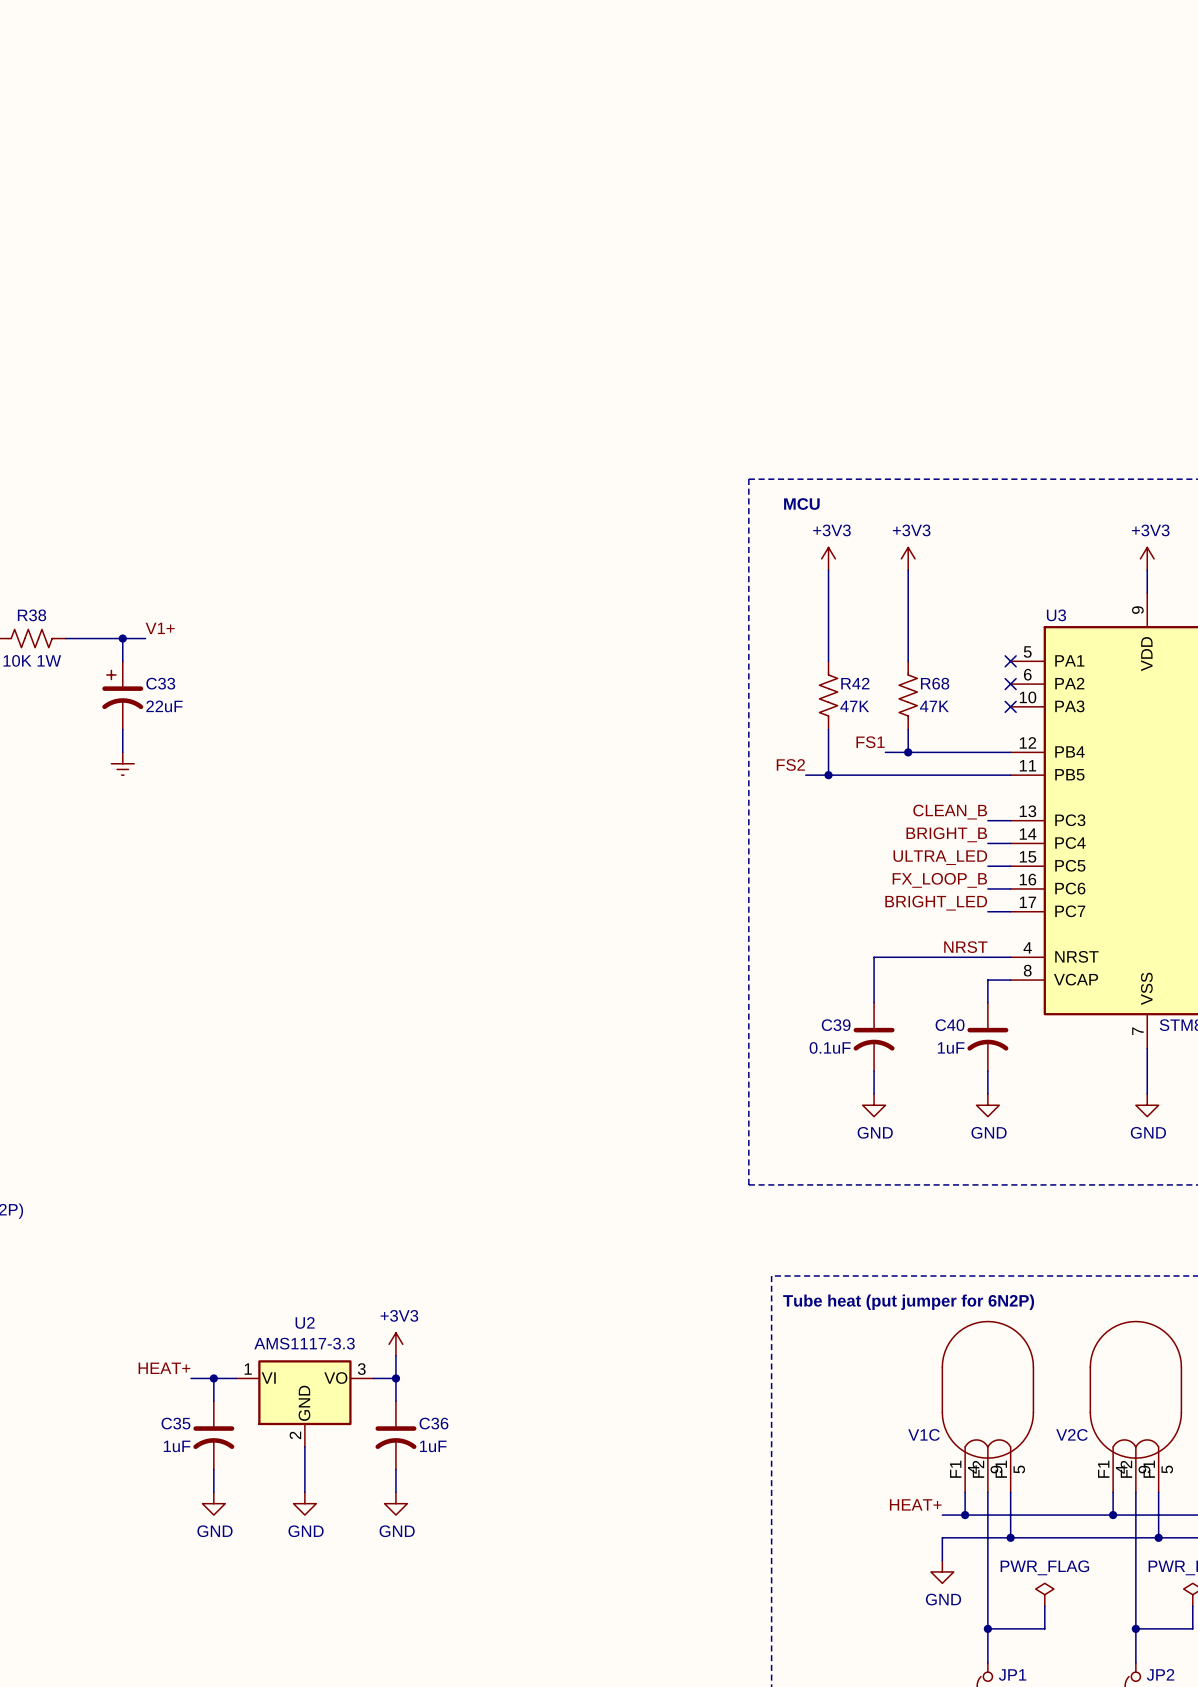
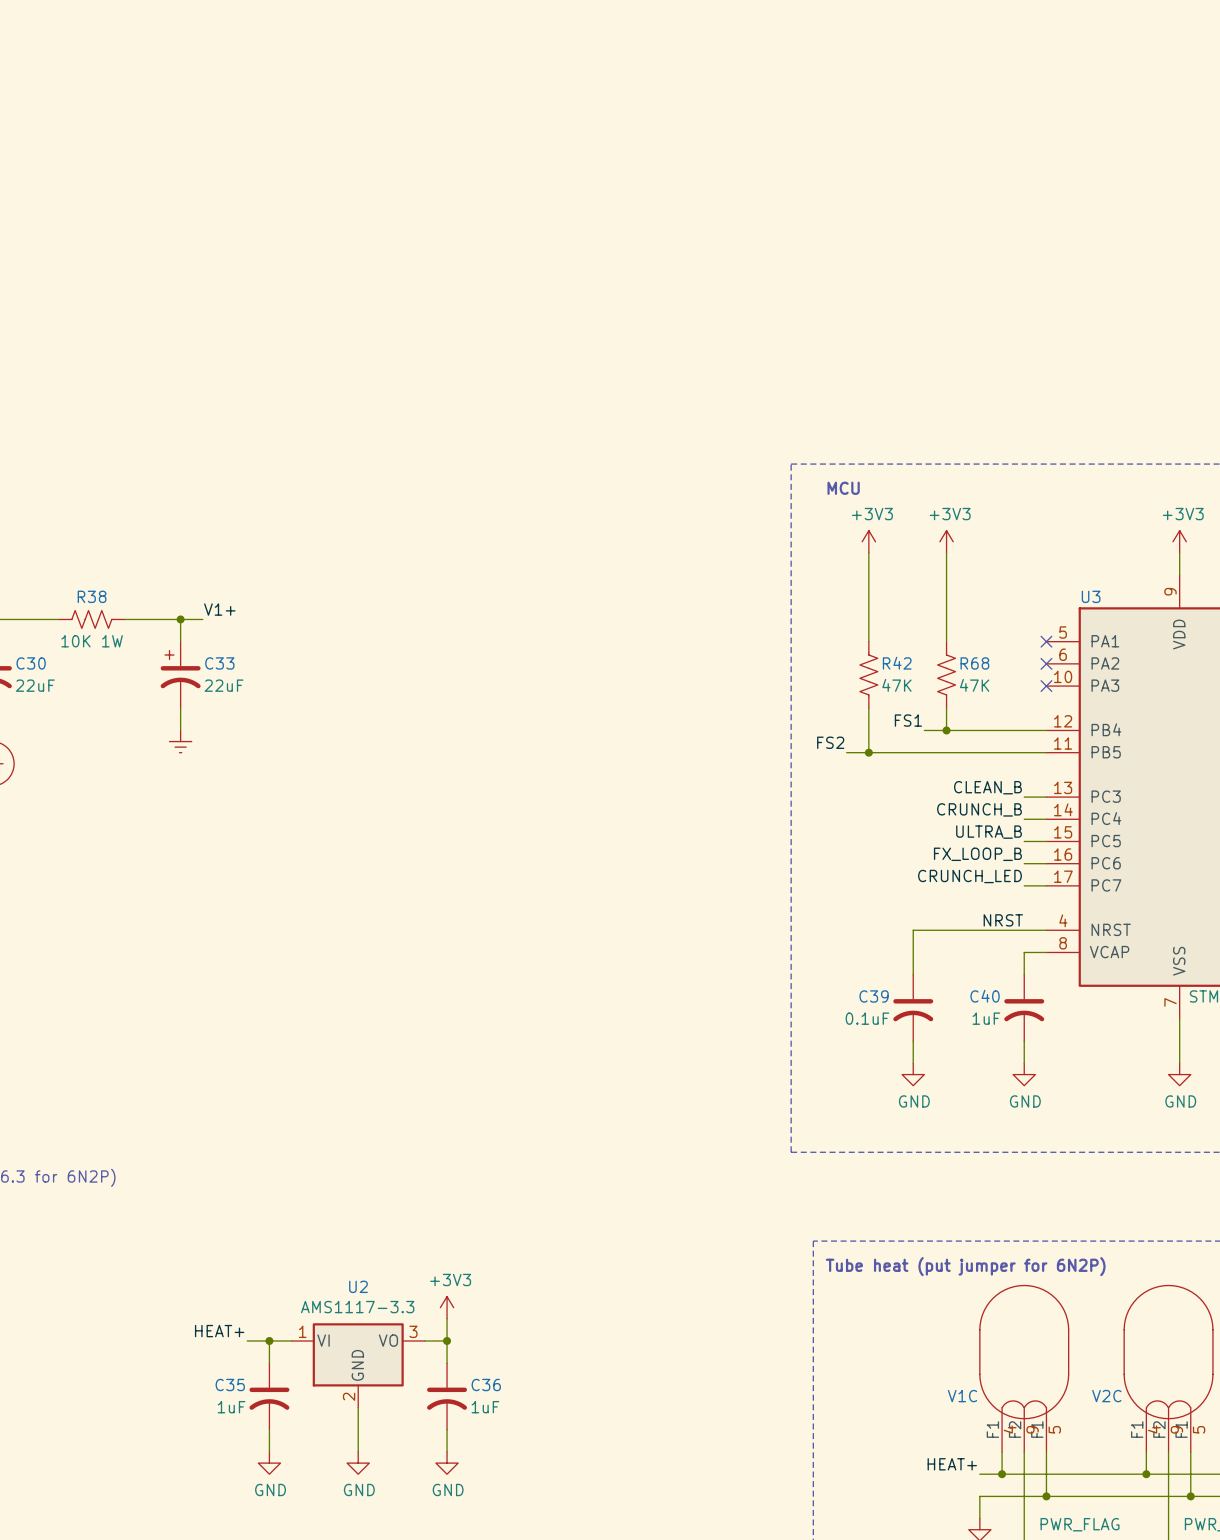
label: BRIGHT_B (946, 834) -> CRUNCH_B (979, 809)
label: ULTRA_LED (940, 857) -> ULTRA_B (989, 832)
label: BRIGHT_LED (936, 903) -> CRUNCH_LED (969, 876)

